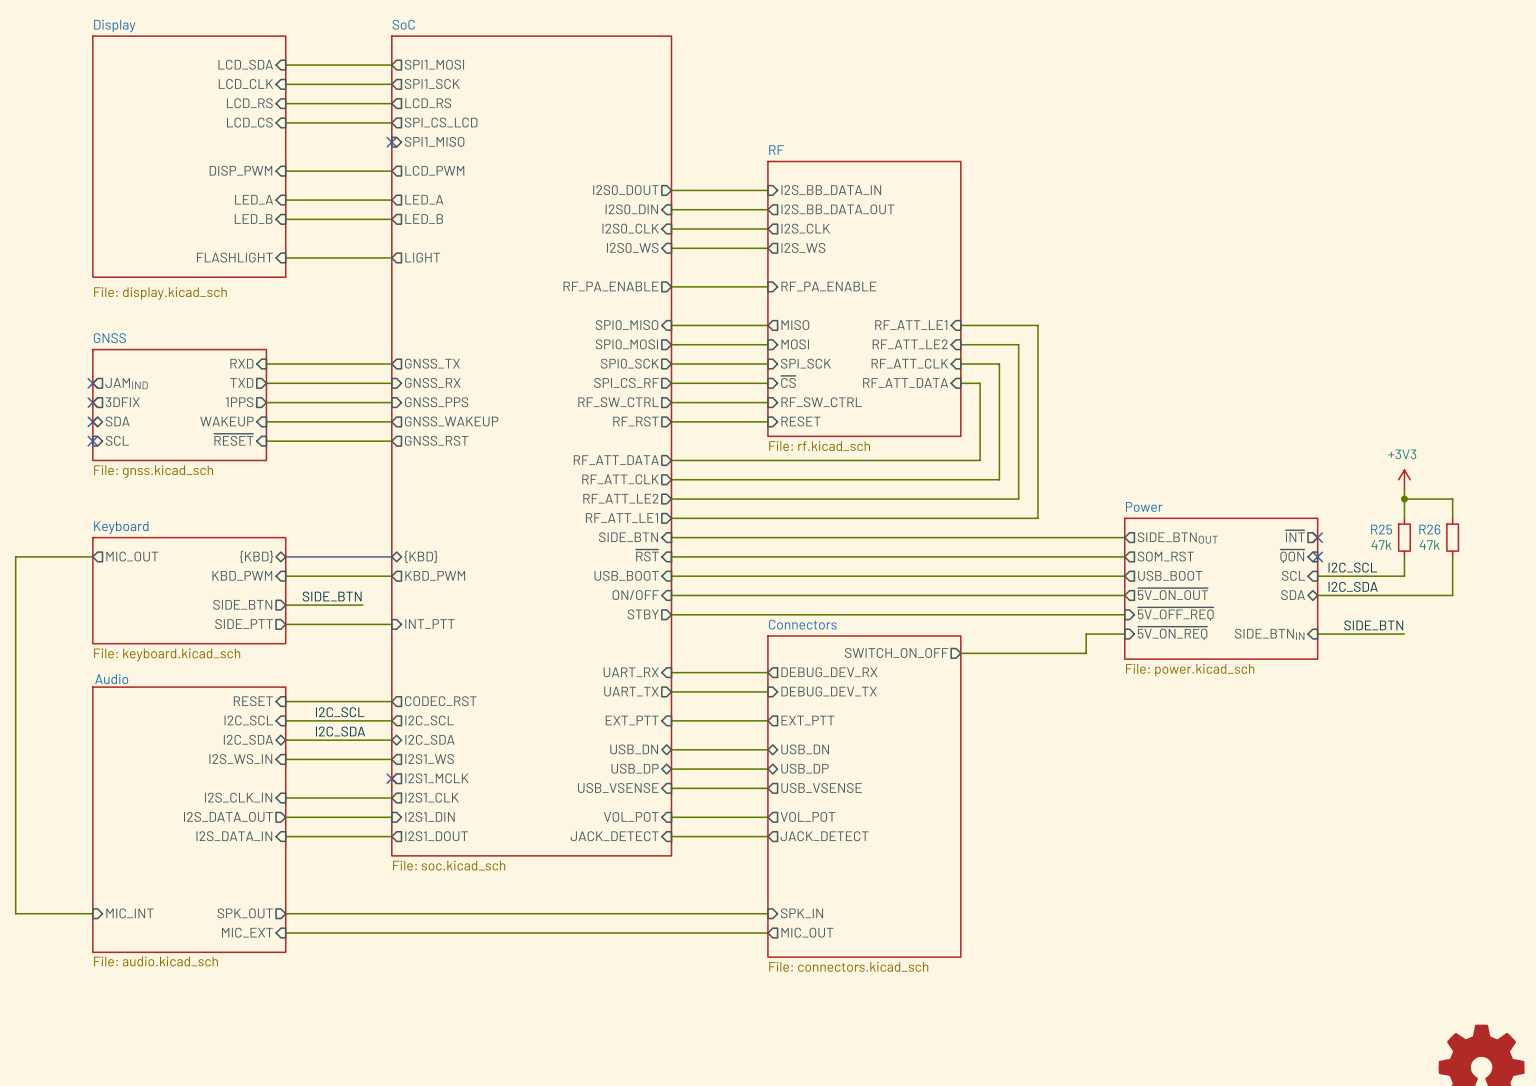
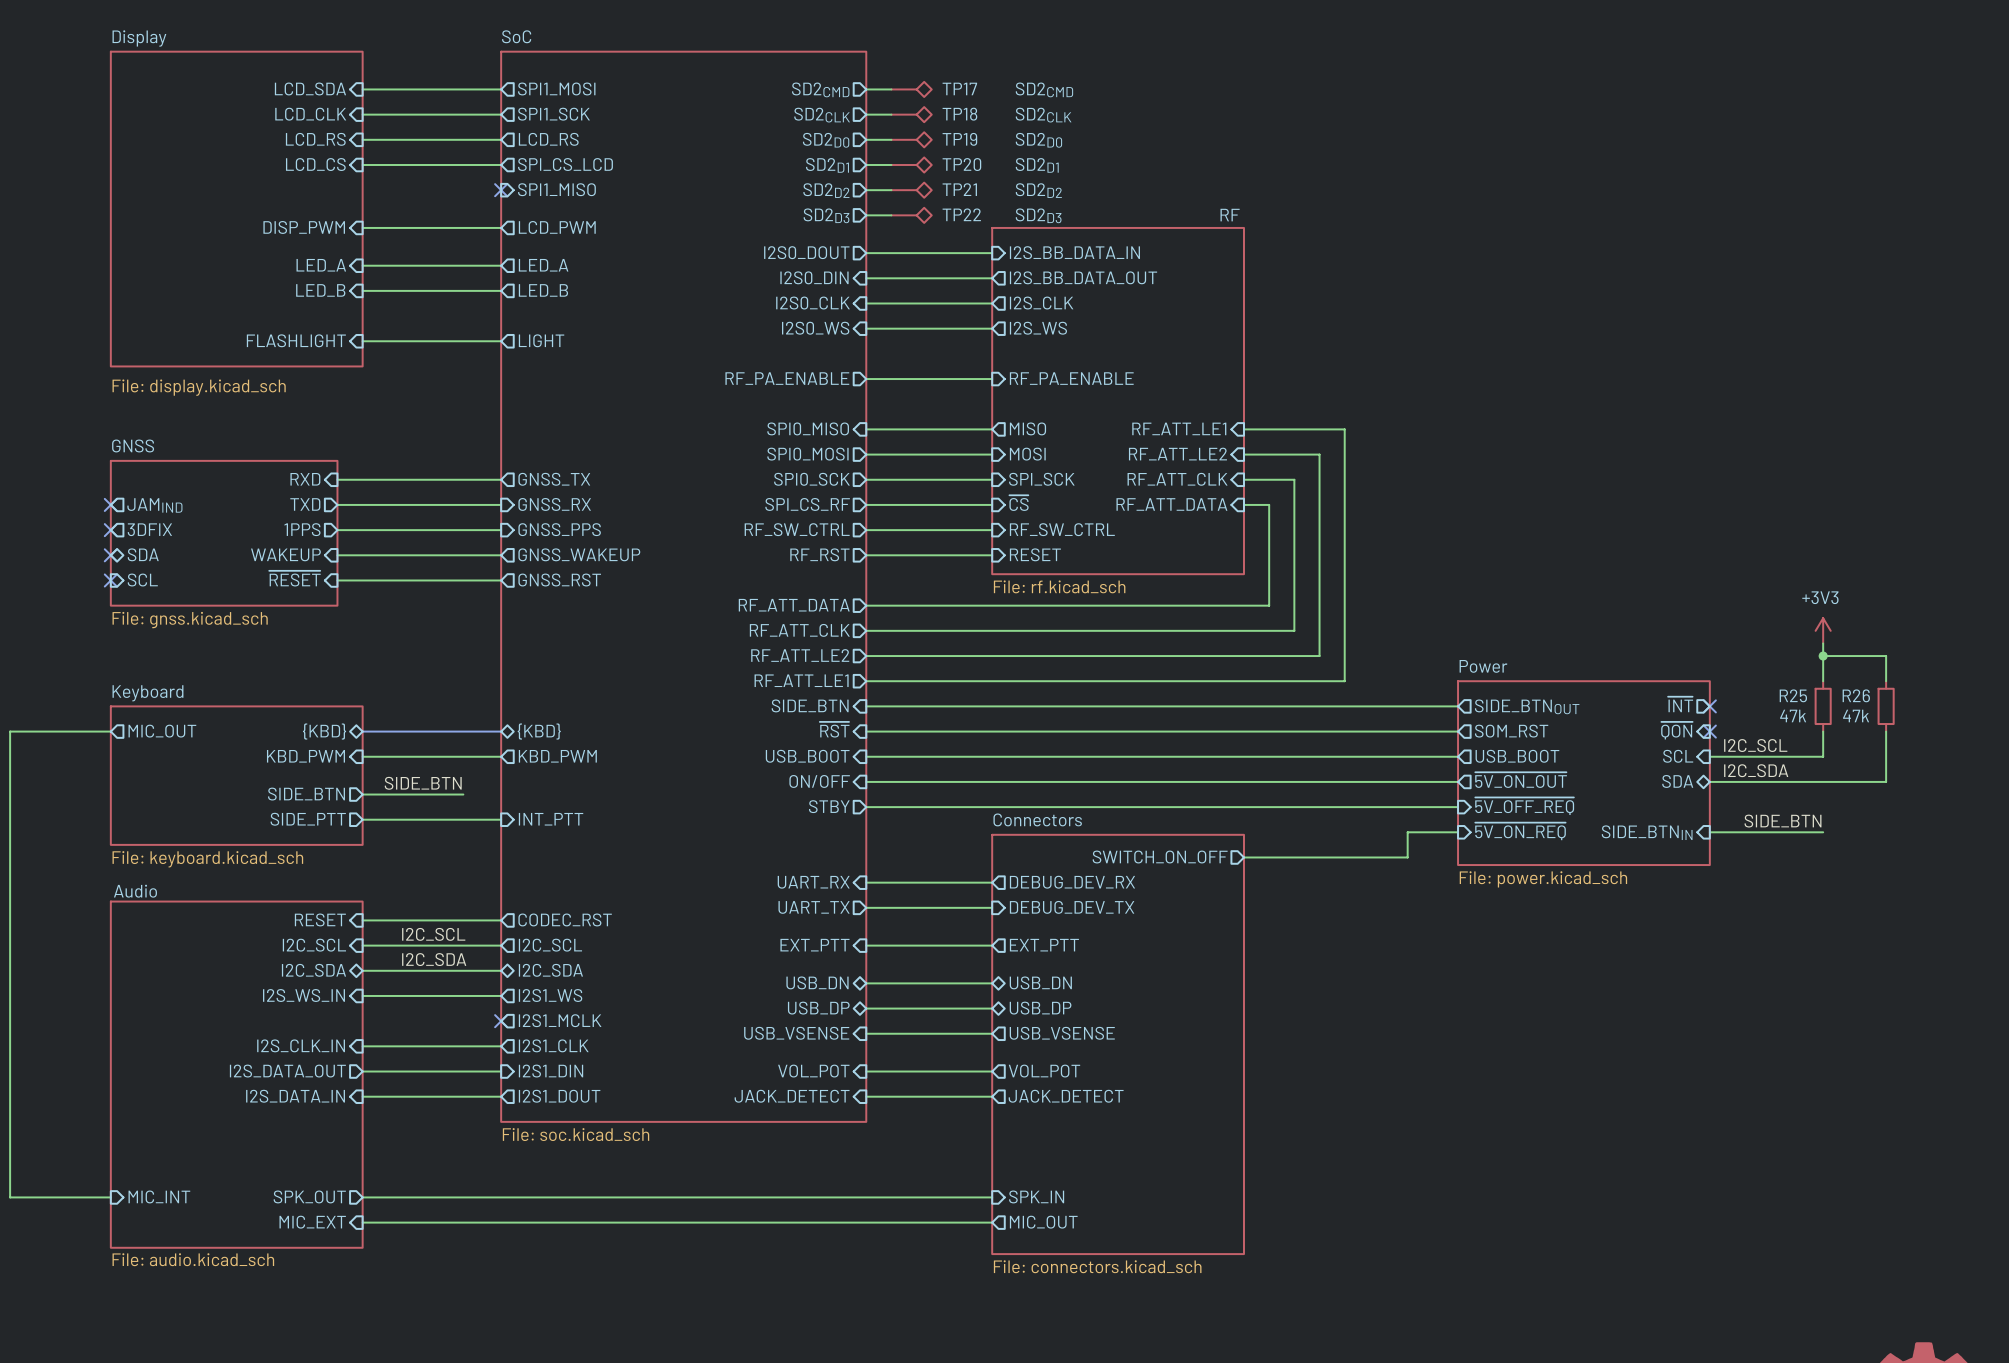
sheet pin: none -> SD2CMD (820, 89)
wire: none -> (866, 89) (891, 89)
TP17: none -> SD2CMD (911, 89)
sheet pin: none -> SD2CLK (822, 115)
wire: none -> (866, 114) (891, 114)
TP18: none -> SD2CLK (911, 114)
sheet pin: none -> SD2D0 (826, 140)
wire: none -> (866, 139) (891, 139)
TP19: none -> SD2D0 (911, 139)
wire: none -> (866, 164) (891, 164)
TP20: none -> SD2D1 (911, 164)
sheet pin: none -> SD2D1 (827, 165)
sheet pin: none -> SD2D2 (826, 190)
wire: none -> (866, 190) (891, 190)
TP21: none -> SD2D2 (911, 190)
sheet RF name position: RF (776, 150) -> RF (1230, 215)
sheet RF shape: [767, 160, 962, 437] -> [991, 227, 1245, 575]
sheet pin: none -> SD2D3 (826, 215)
wire: none -> (866, 215) (891, 215)
TP22: none -> SD2D3 (911, 215)

